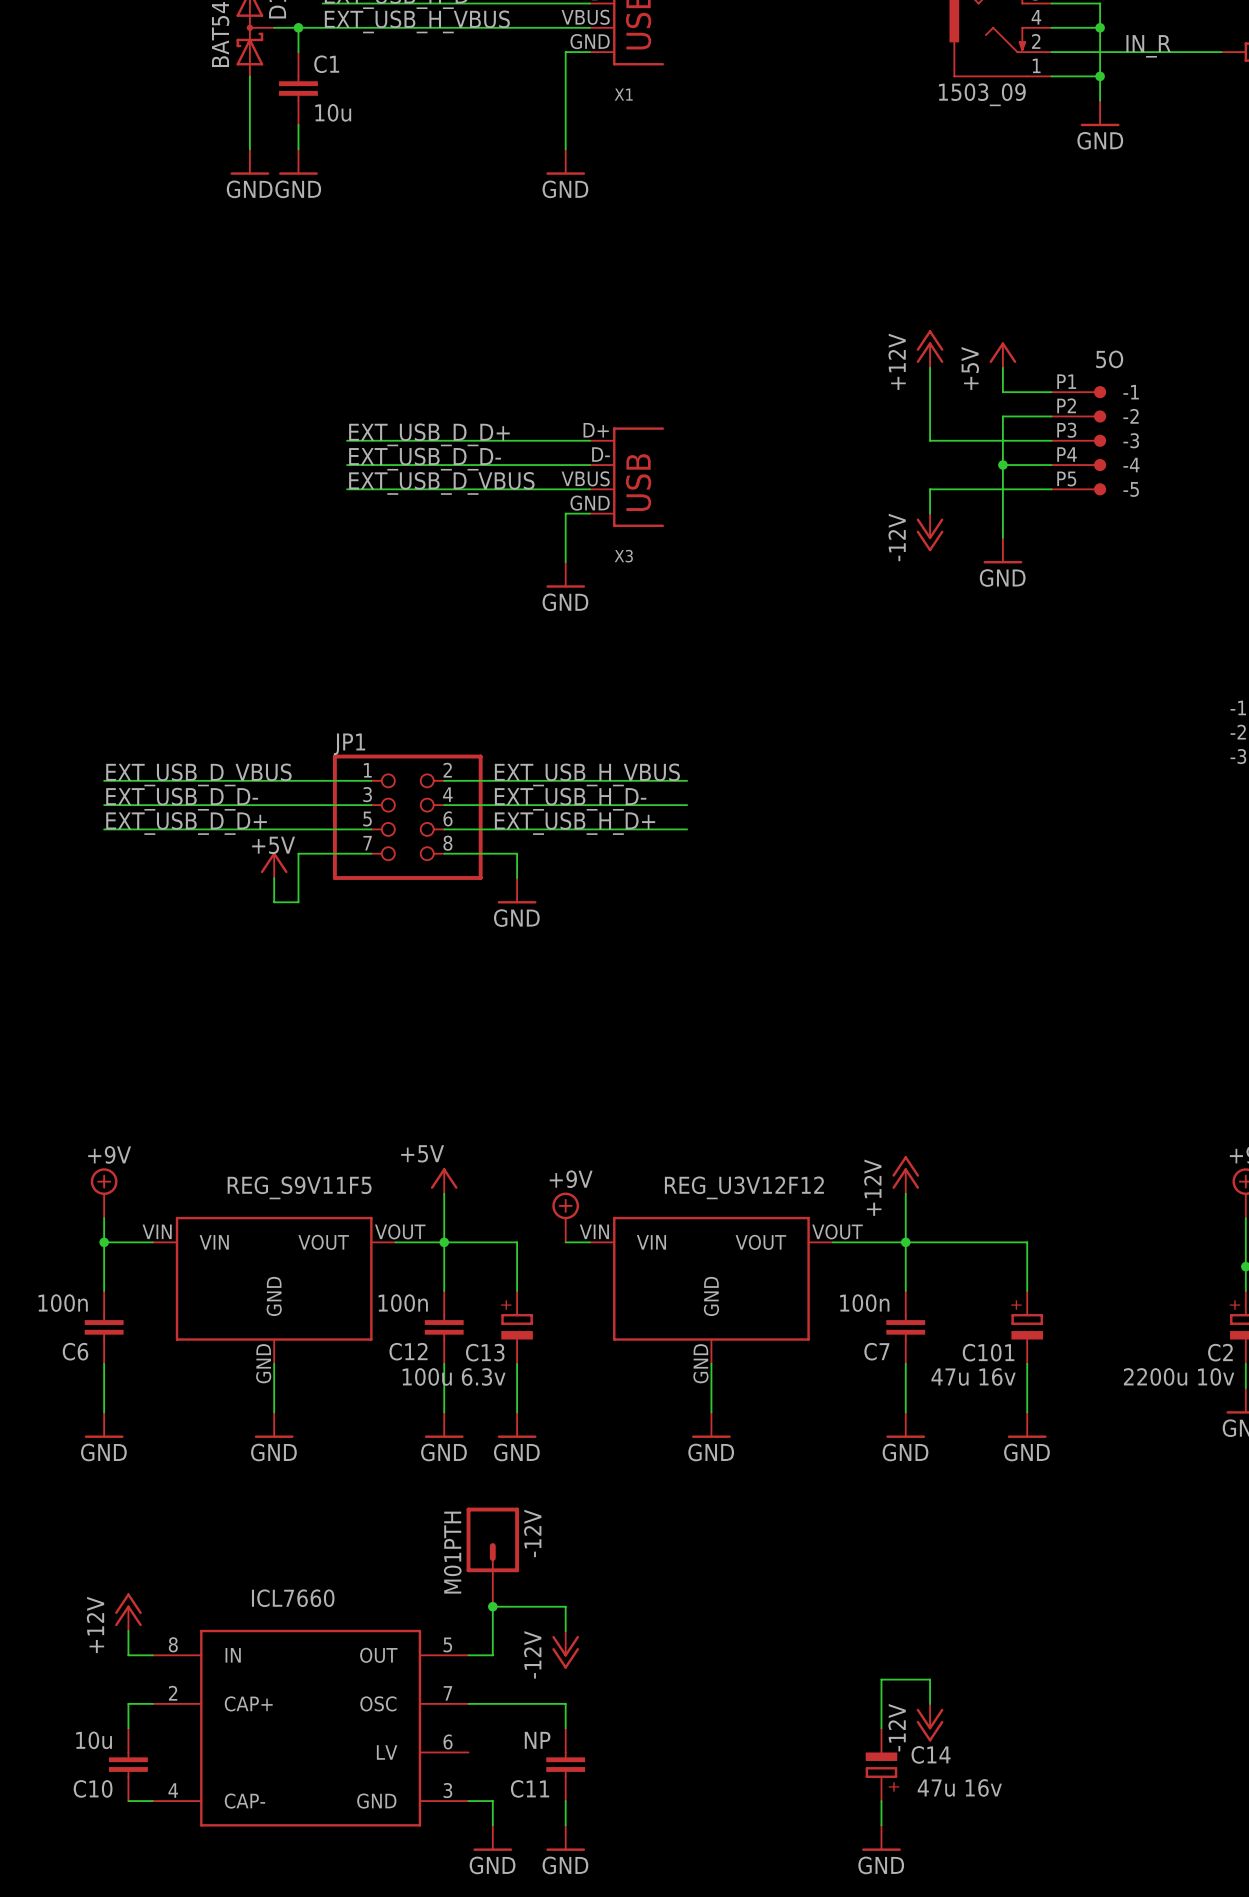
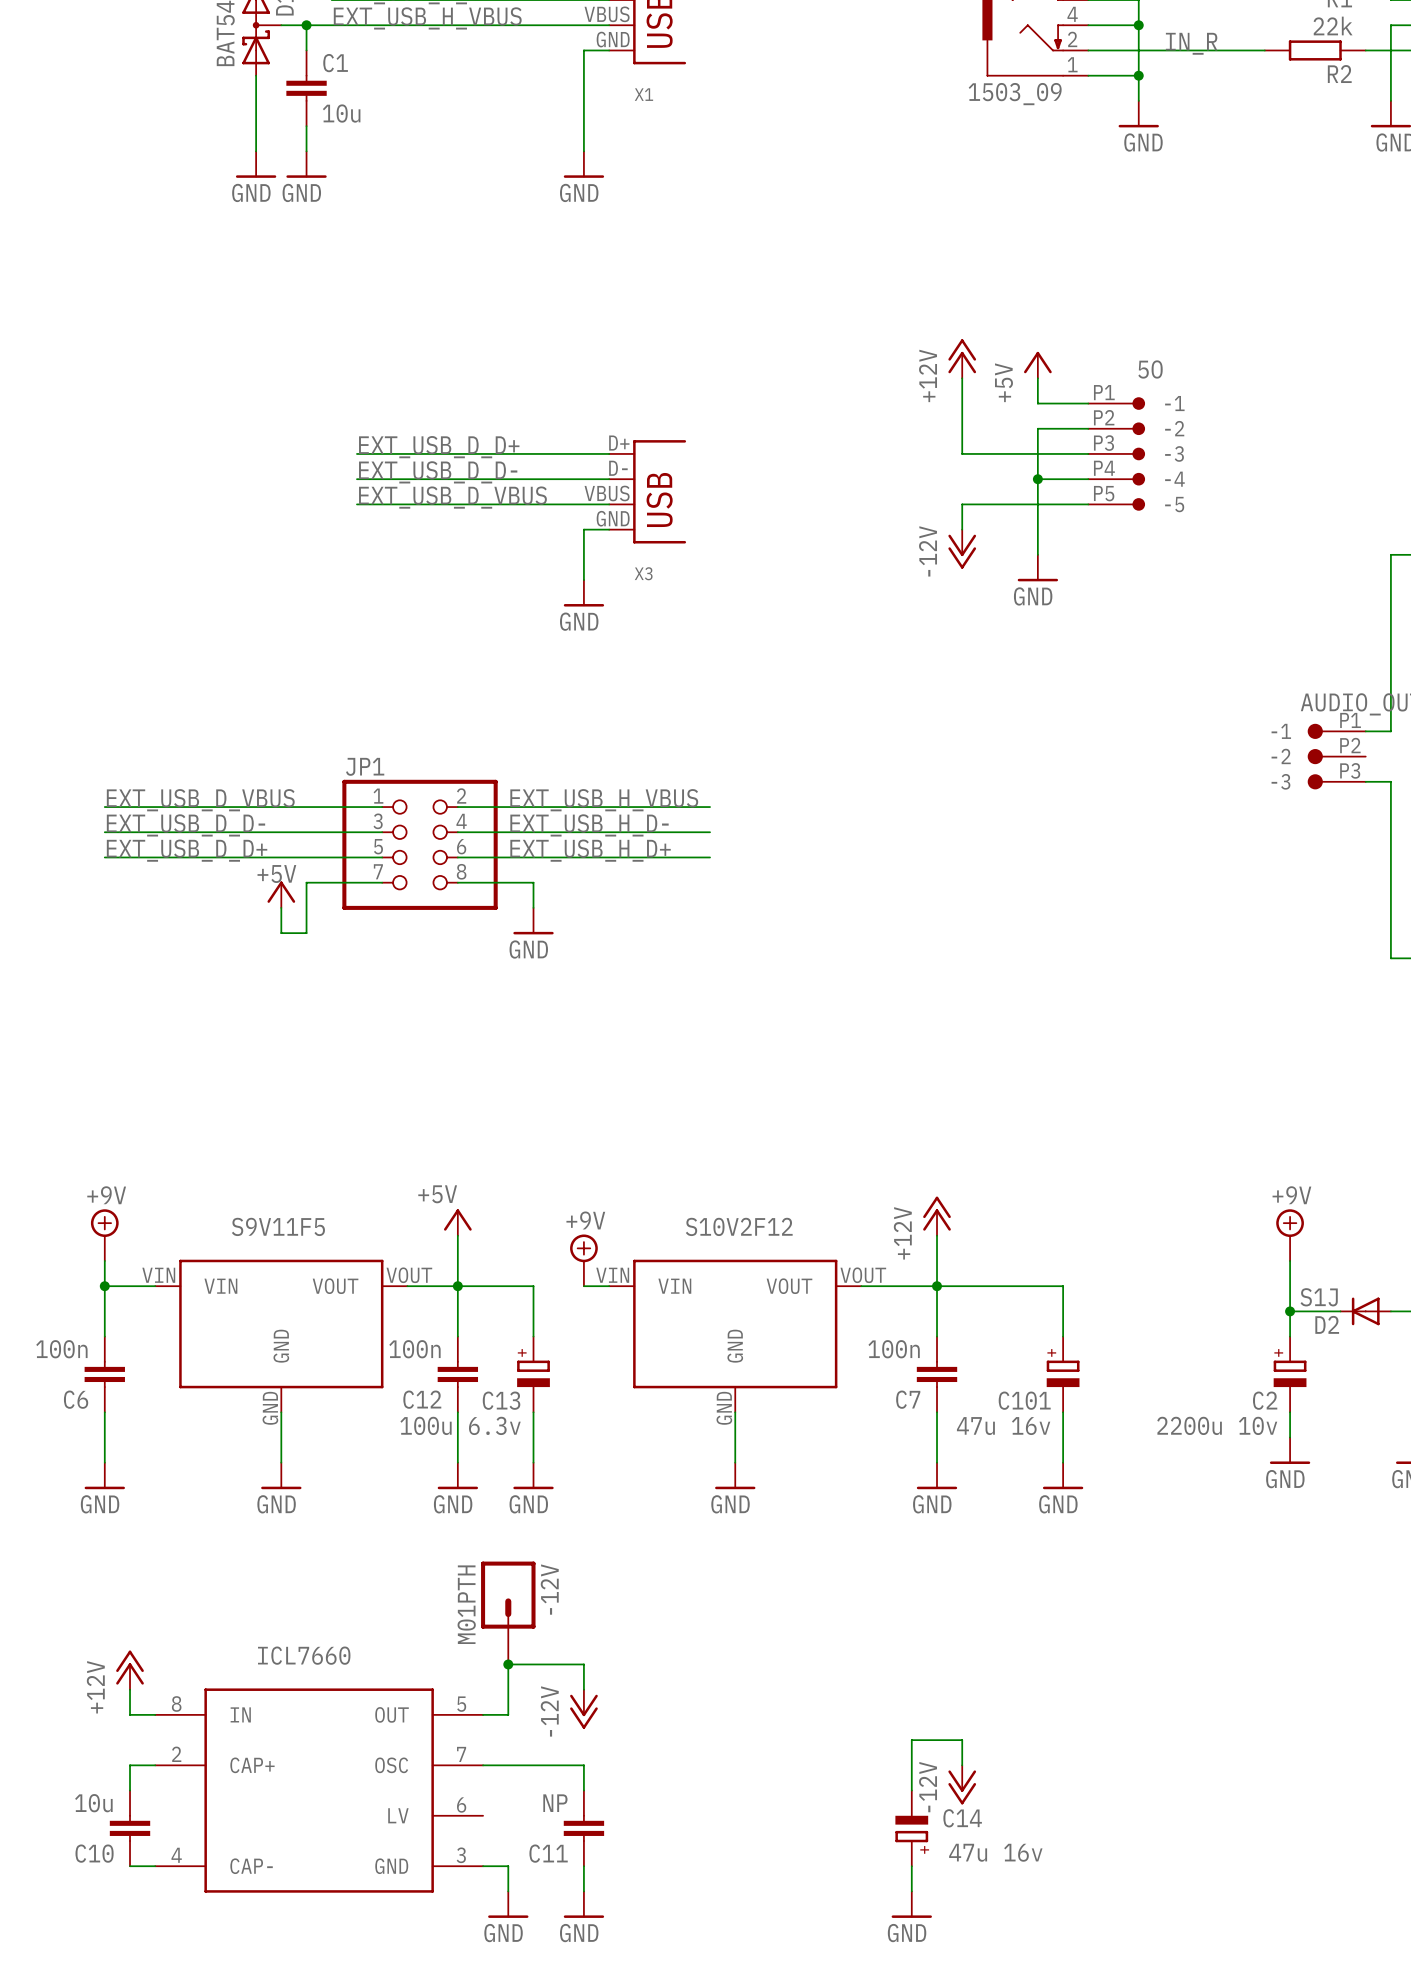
part value: REG_S9V11F5 (299, 1187) -> S9V11F5 (278, 1226)
part value: REG_U3V12F12 (744, 1187) -> S10V2F12 (739, 1226)

